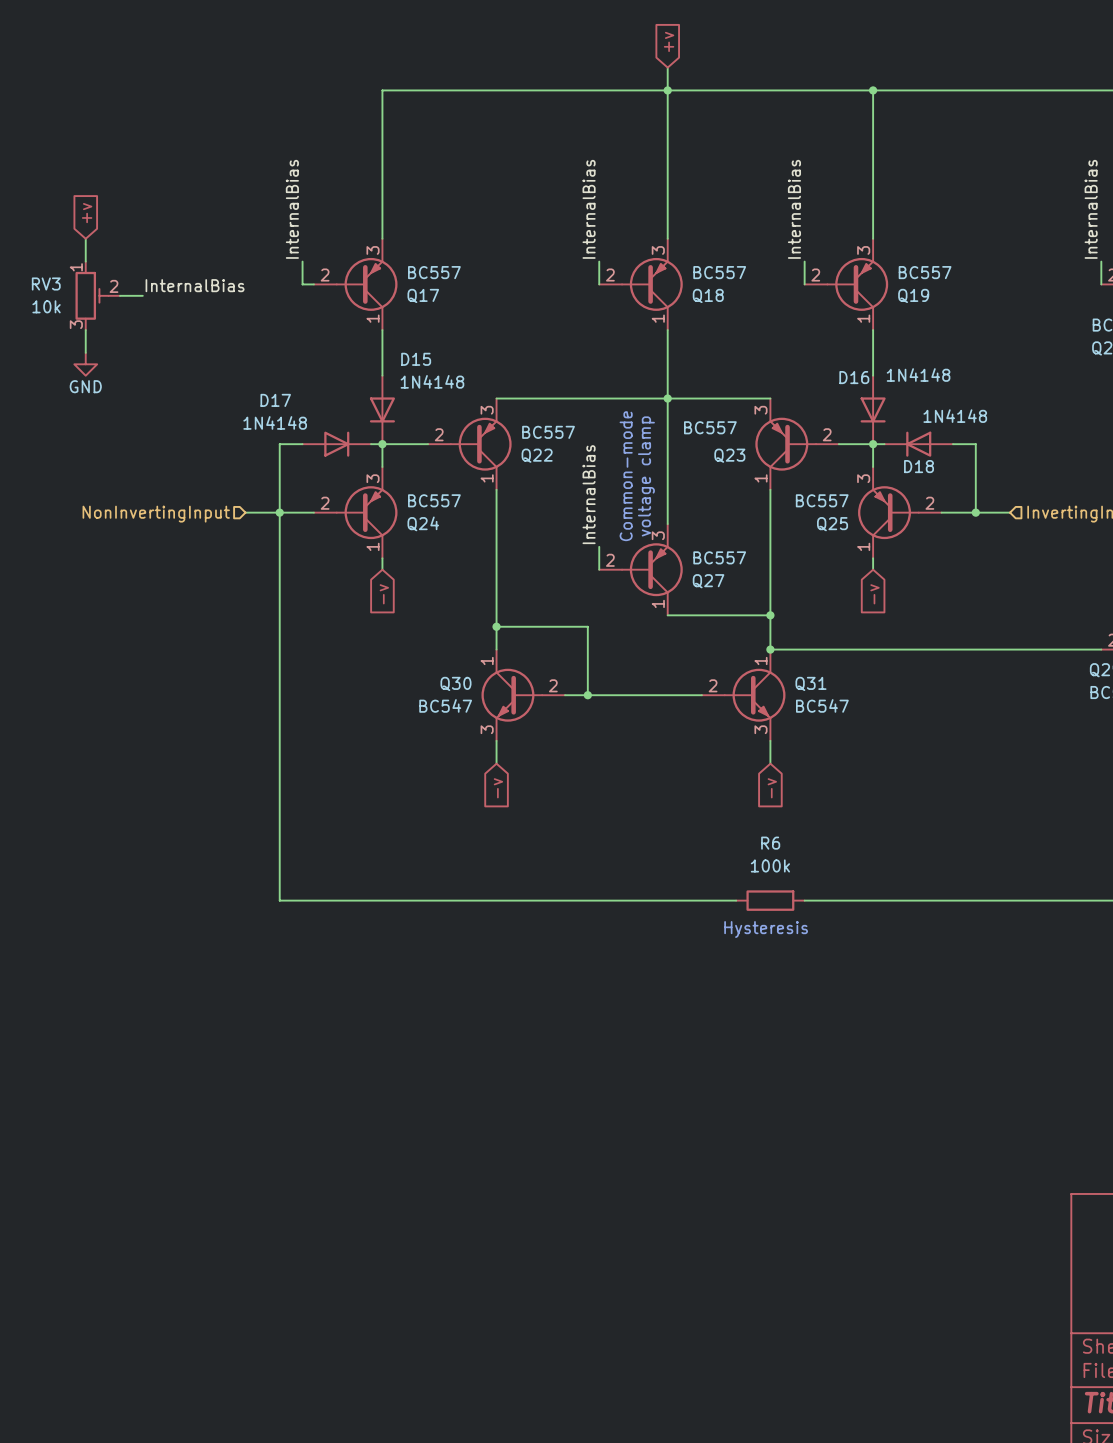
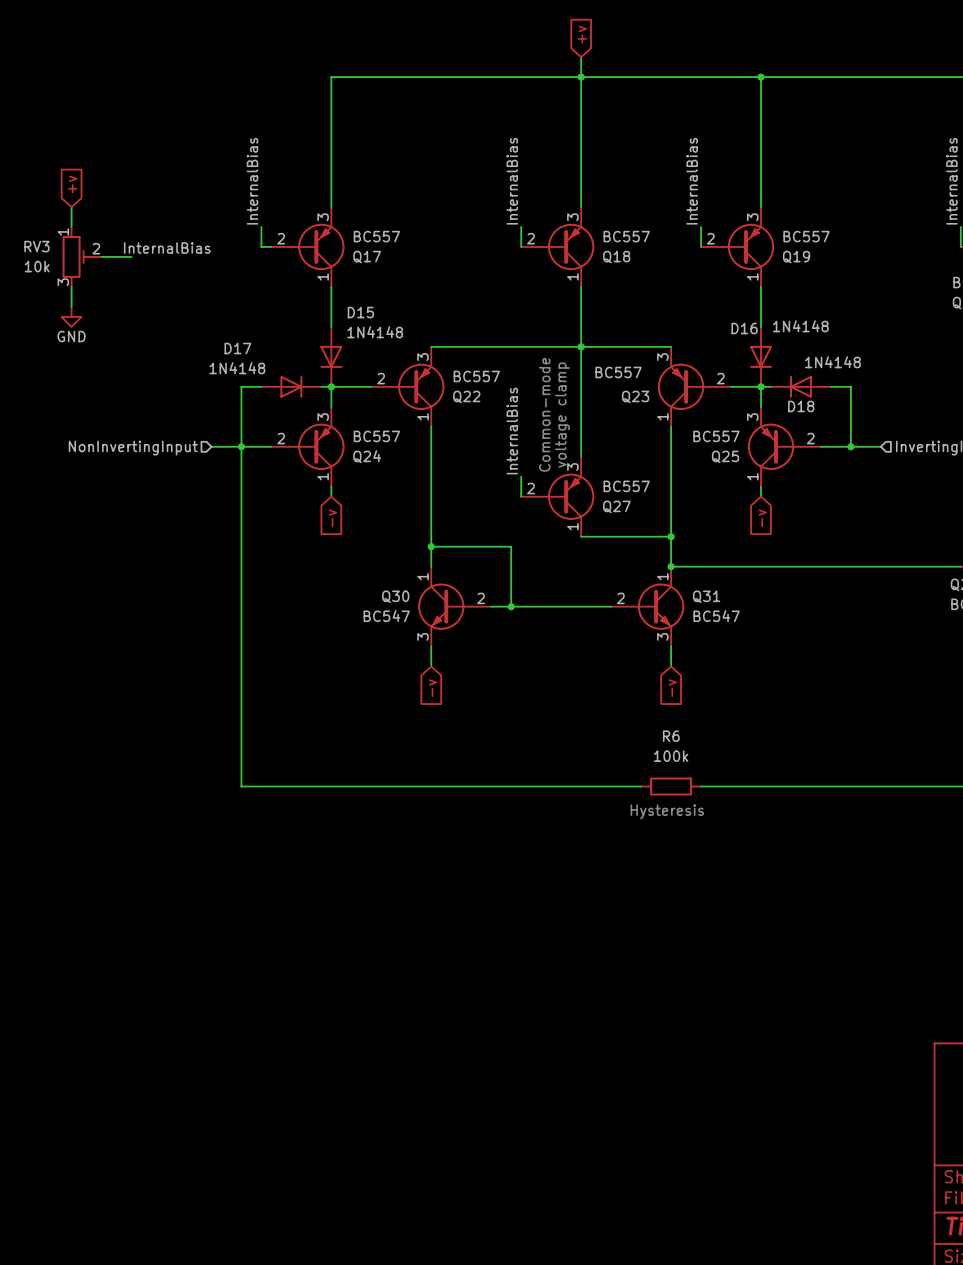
wire: none -> (121, 256) (131, 256)

